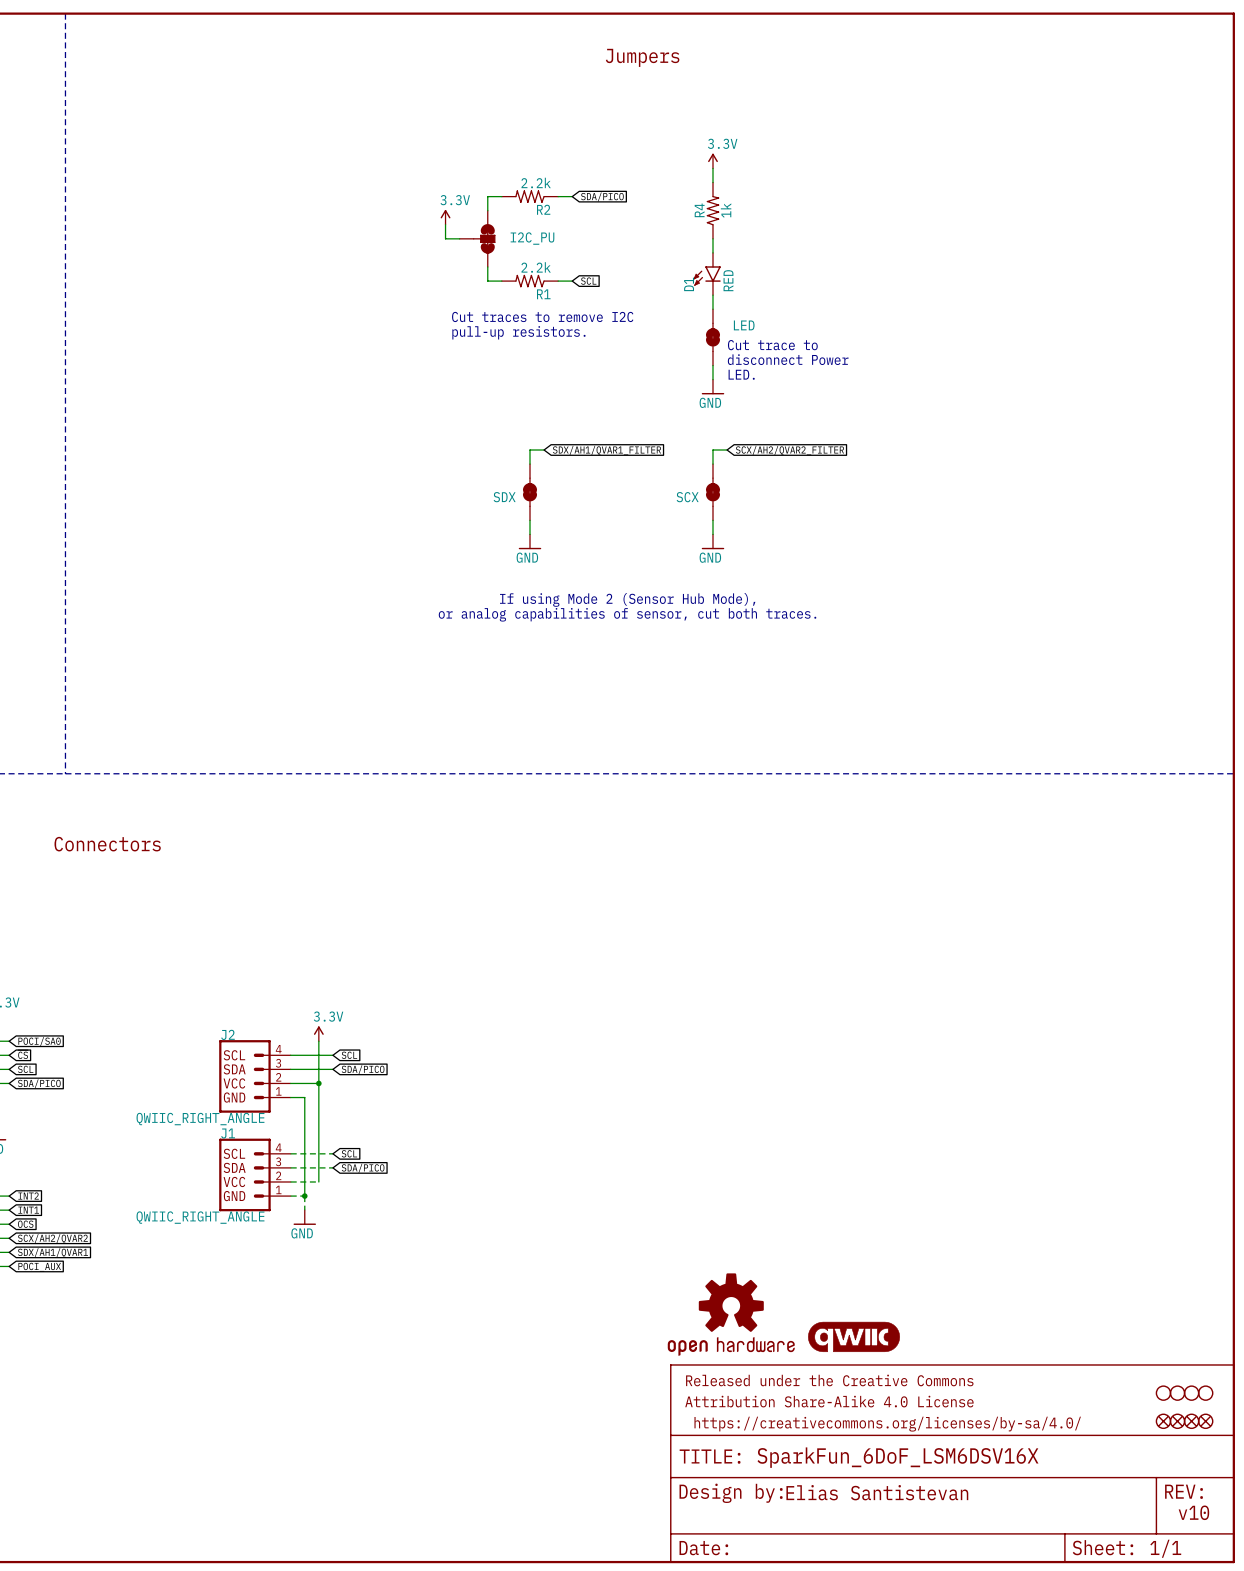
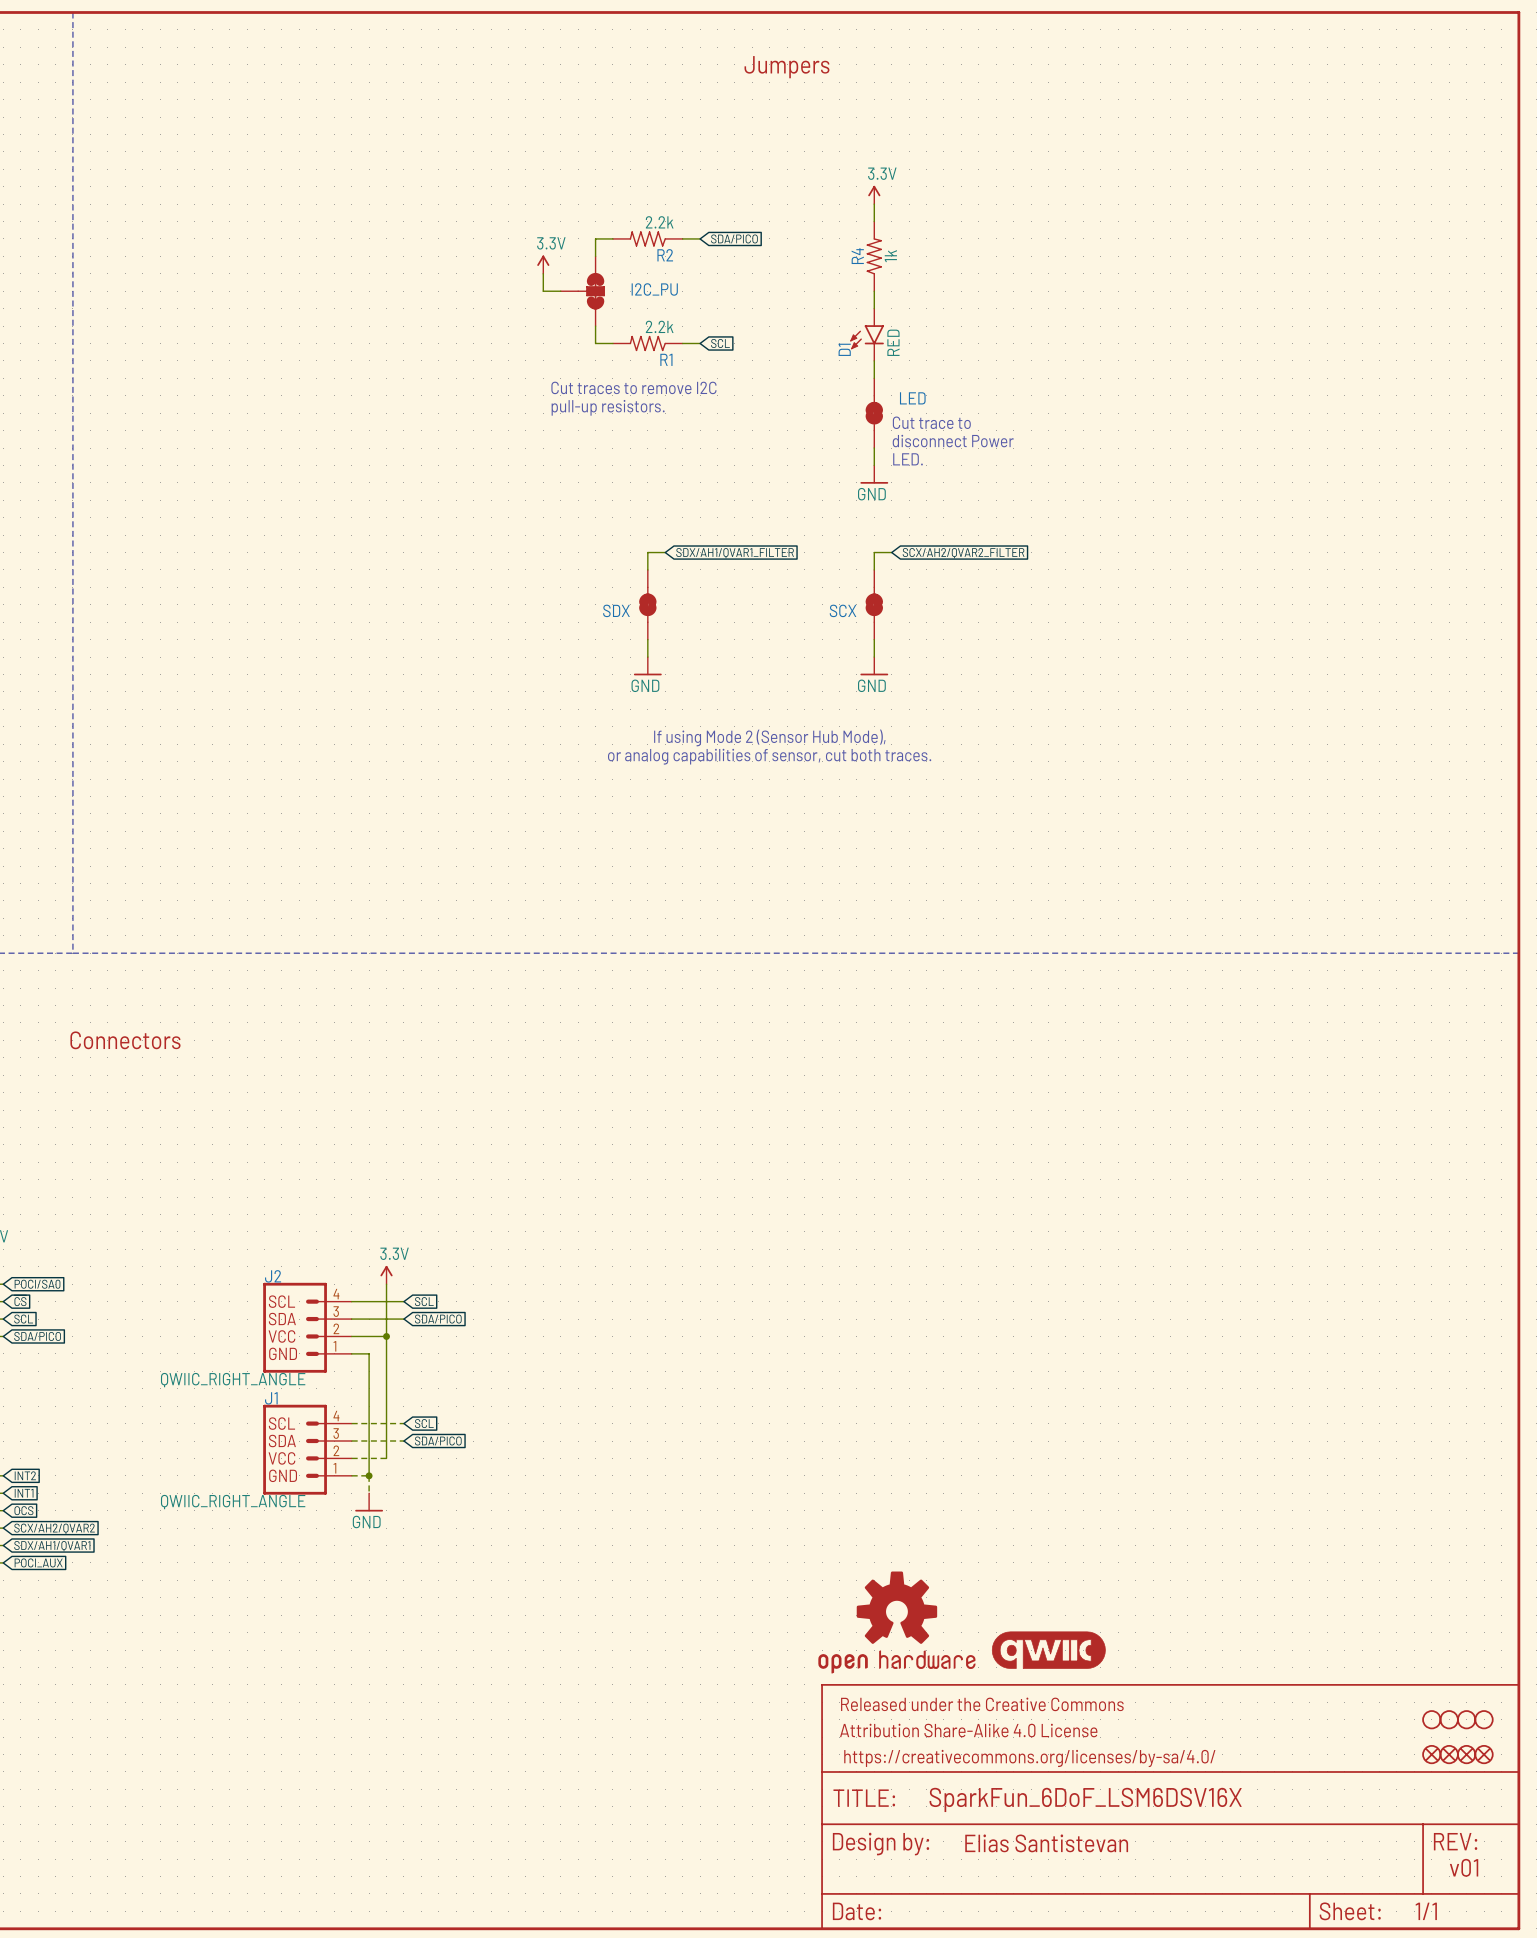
text: v10 (1193, 1512) -> v01 (1464, 1867)

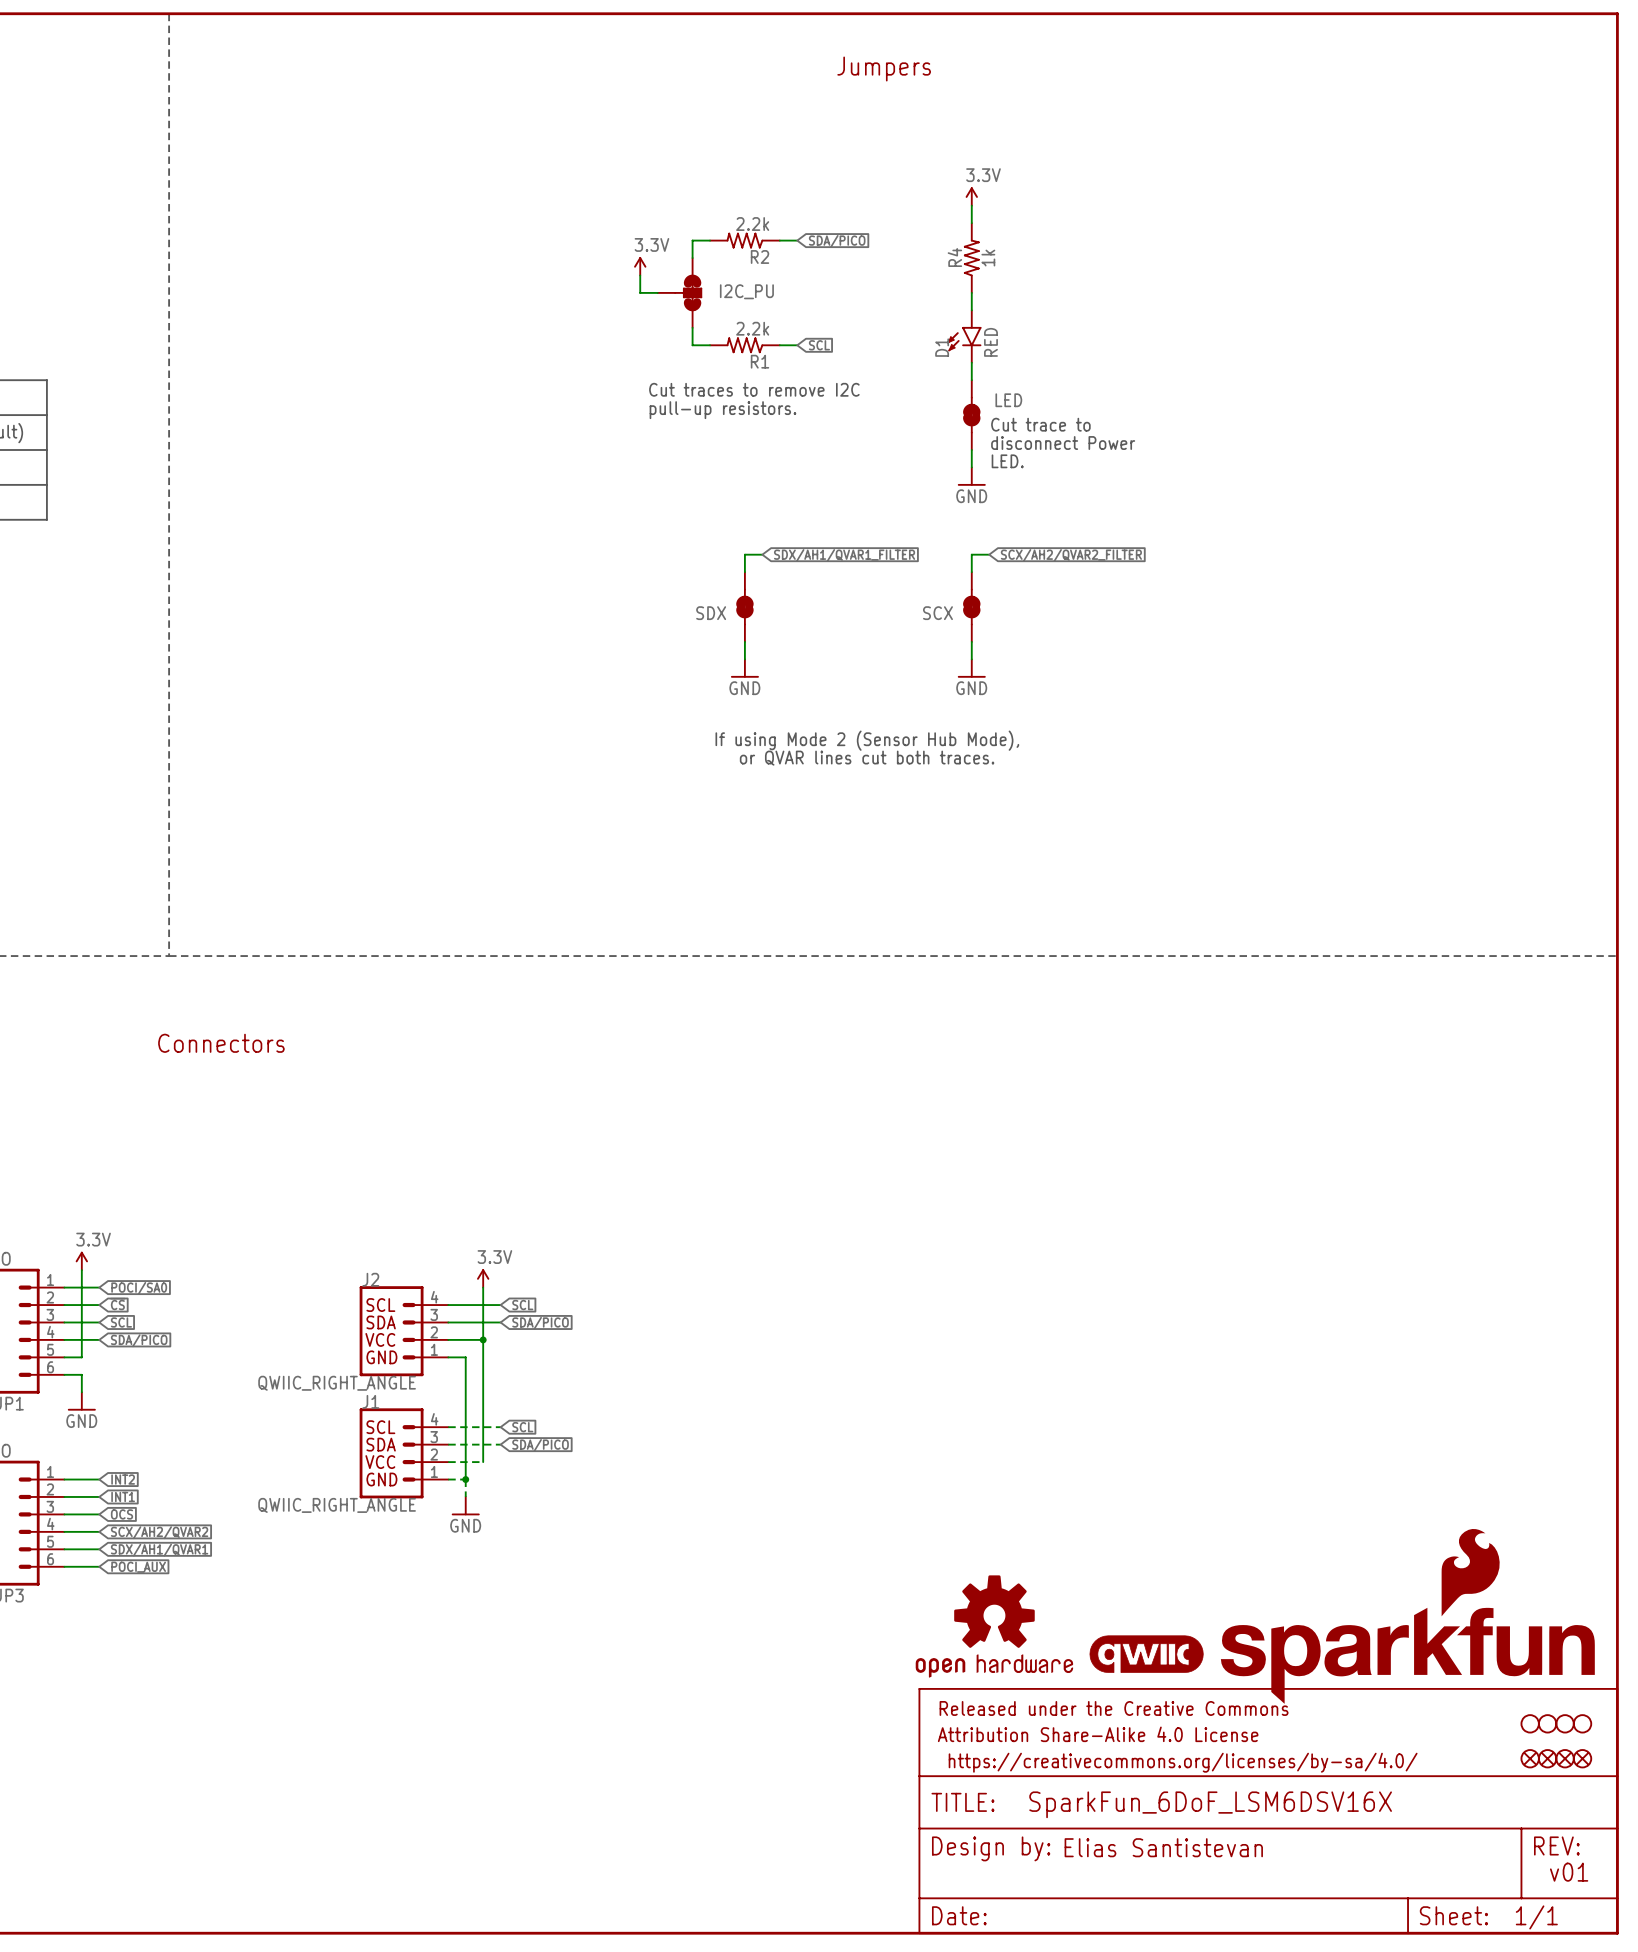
text: or analog capabilities of sensor, cut both traces. (769, 756) -> or QVAR lines cut both traces. (867, 758)
part: none -> (1407, 1616)

